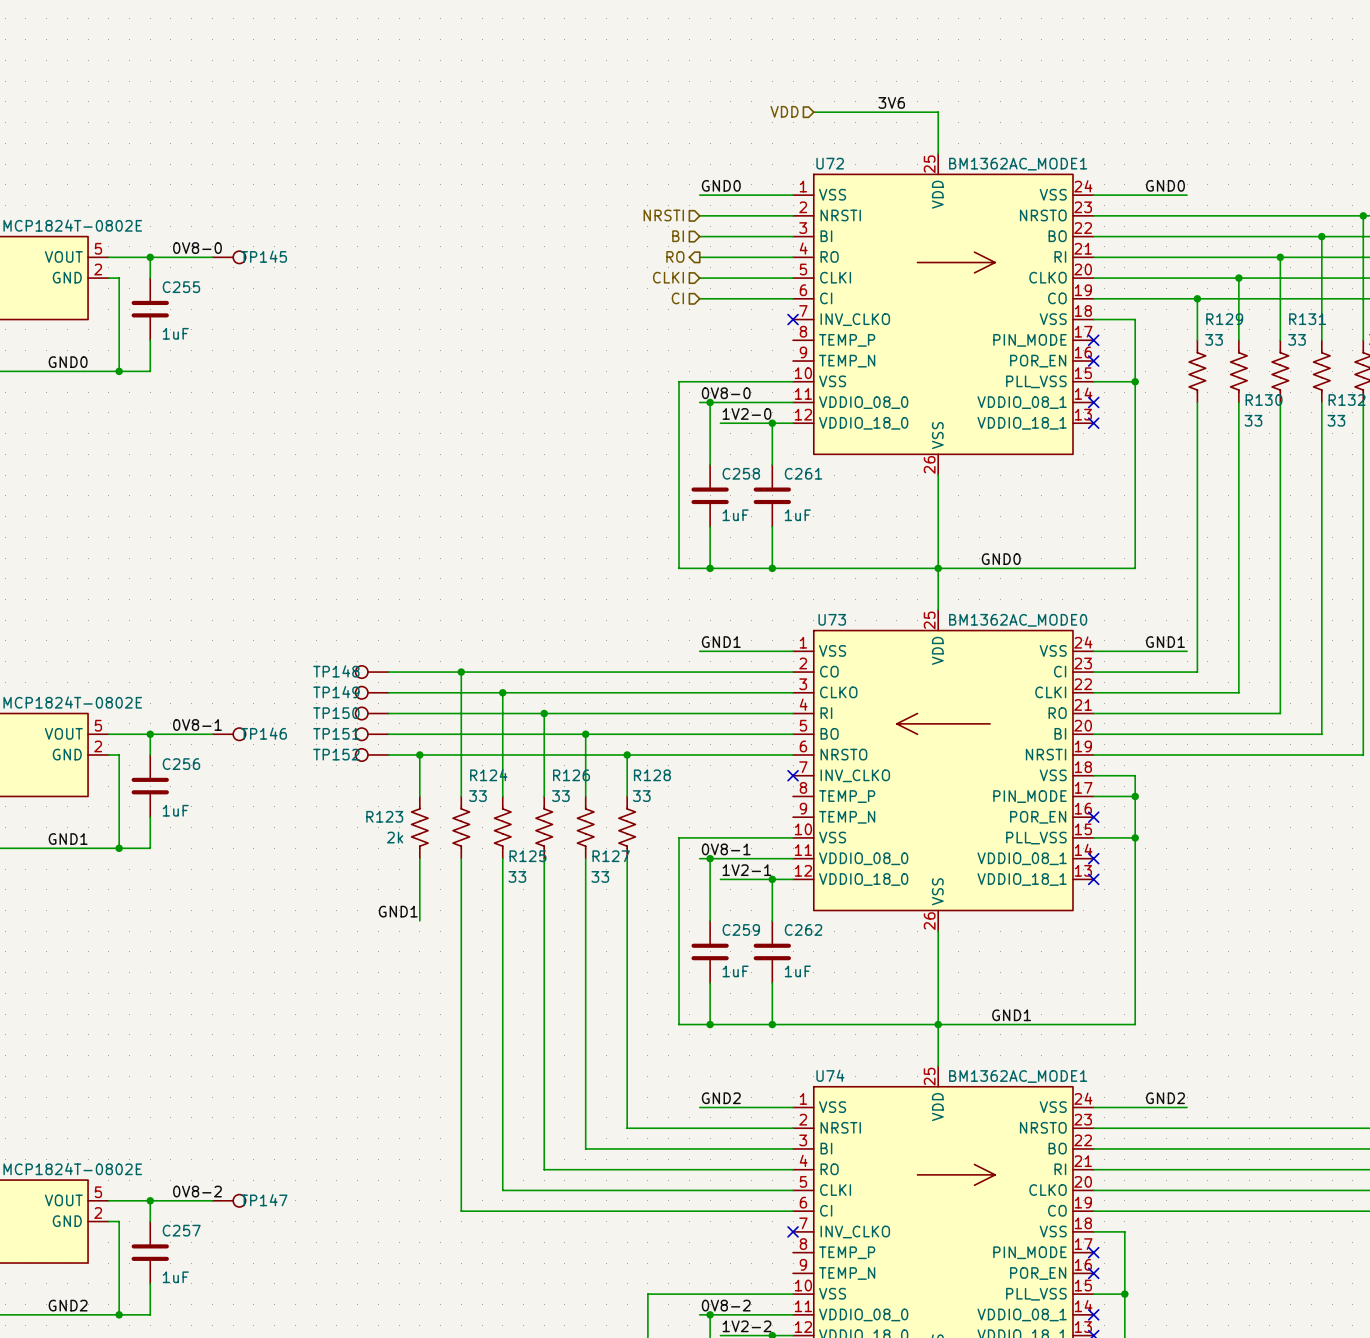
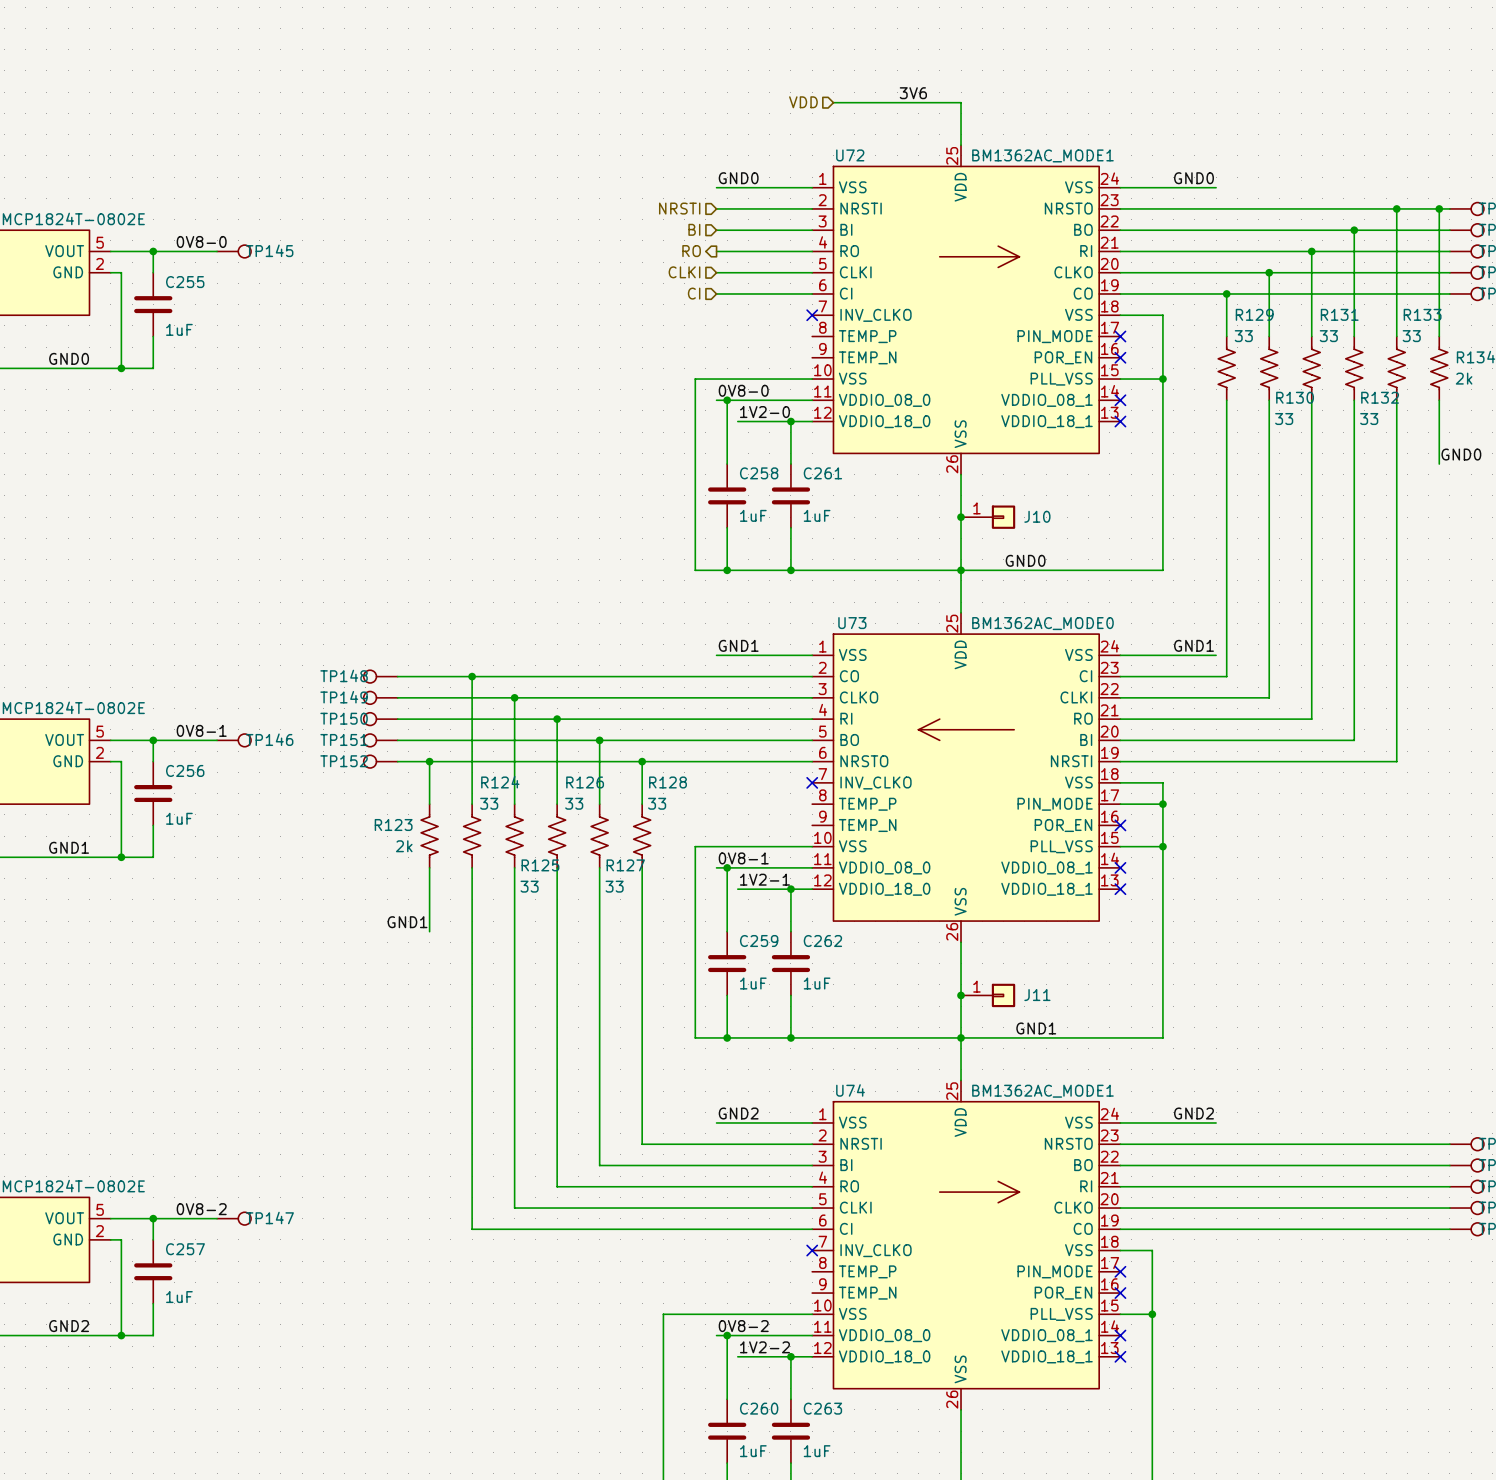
junction: none -> (961, 517)
J10: none -> (988, 517)
junction: none -> (961, 995)
J11: none -> (988, 995)

